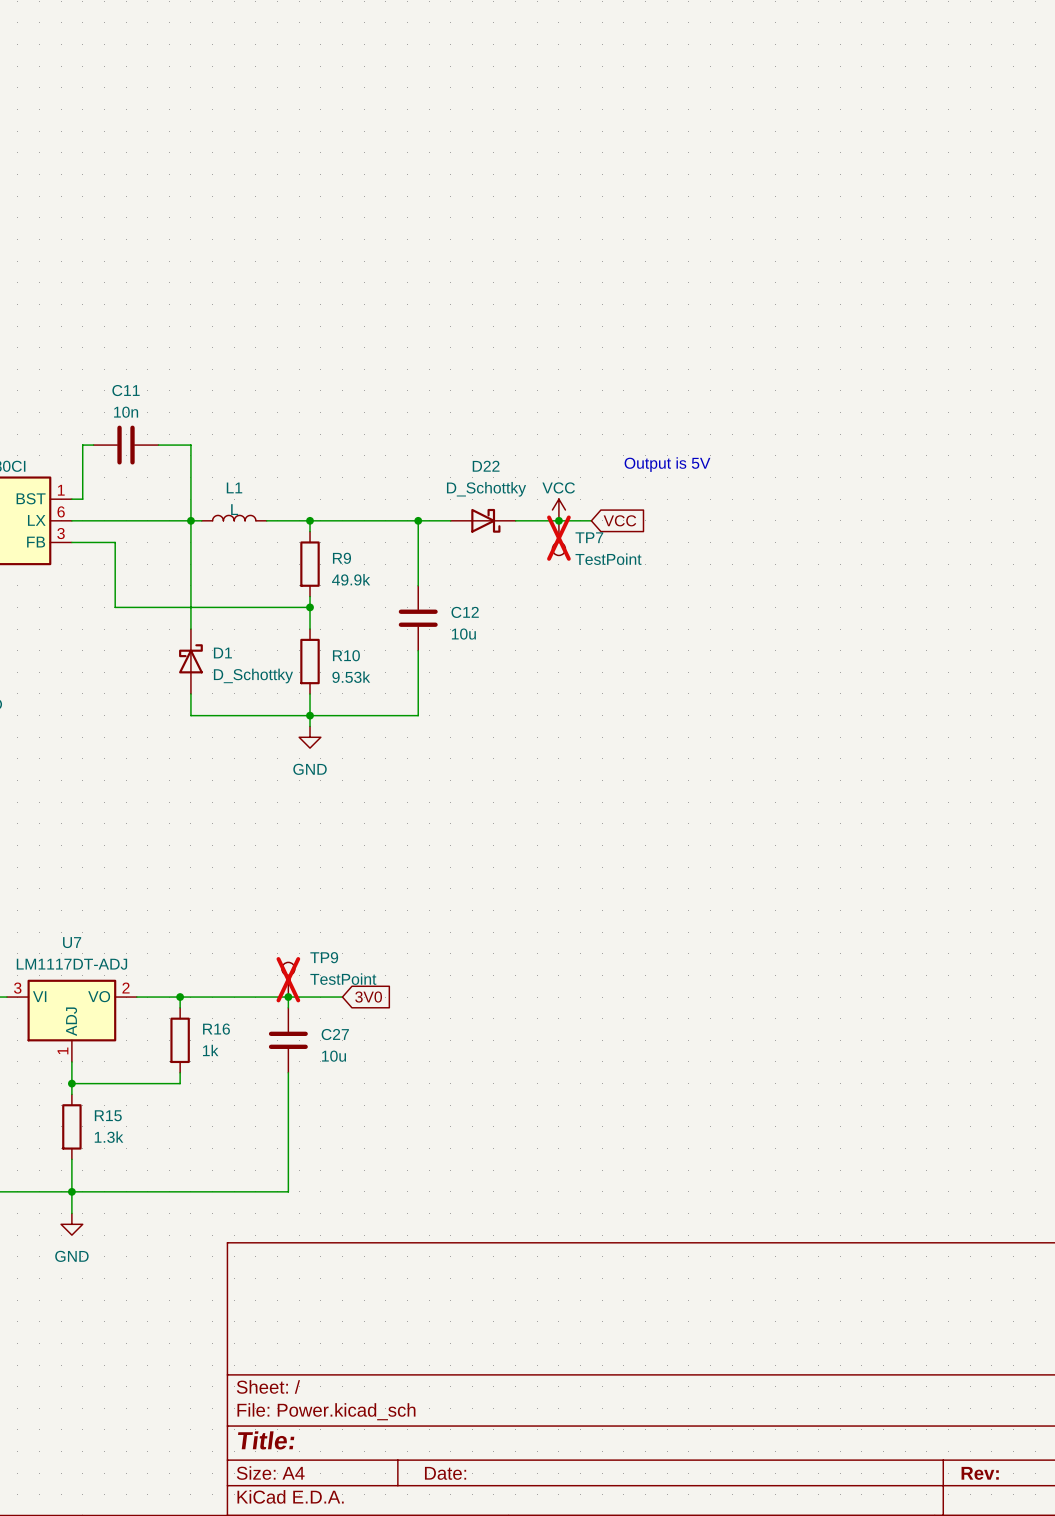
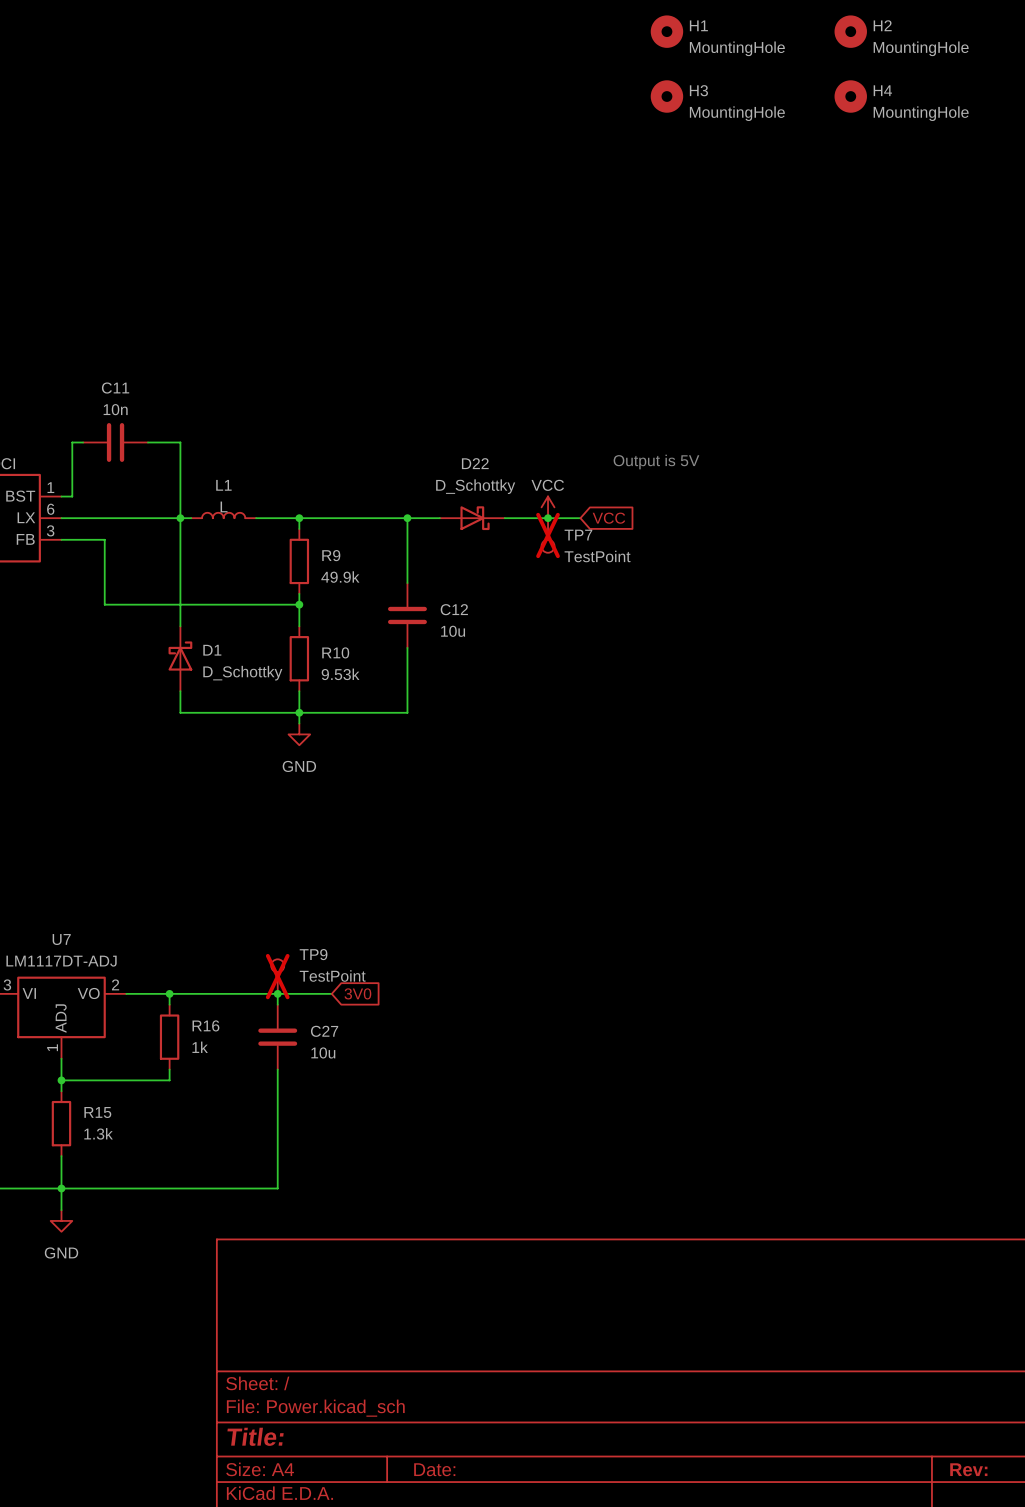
H1: none -> MountingHole (666, 31)
H2: none -> MountingHole (850, 31)
H3: none -> MountingHole (666, 96)
H4: none -> MountingHole (850, 96)

